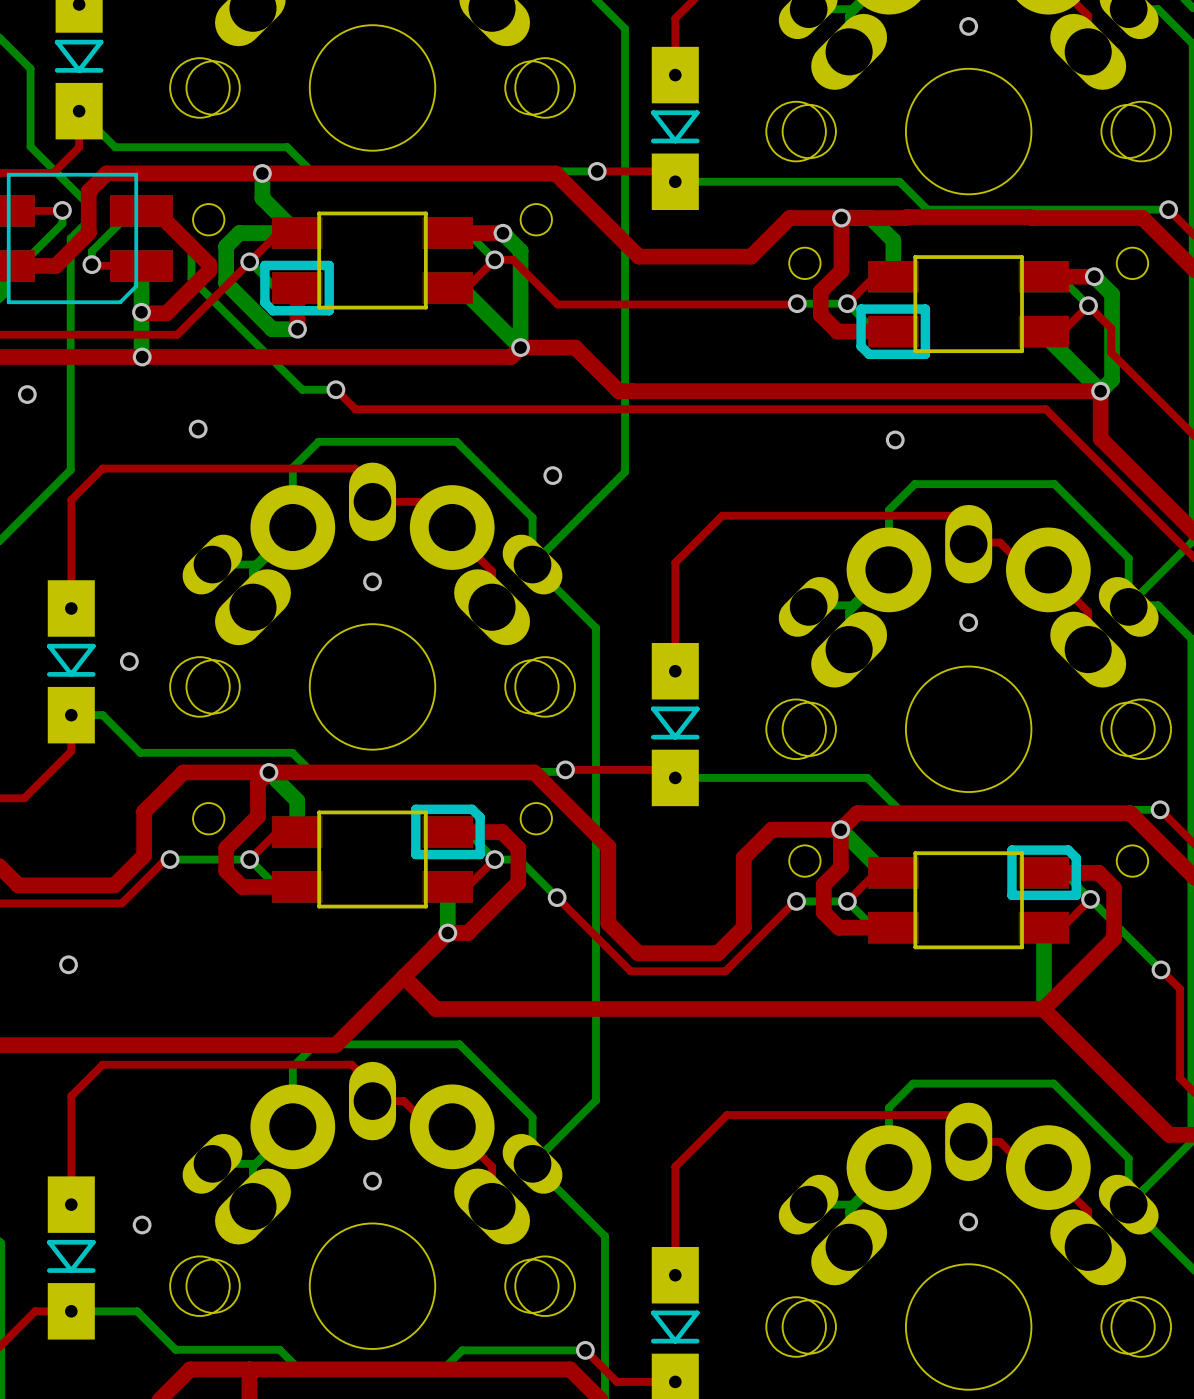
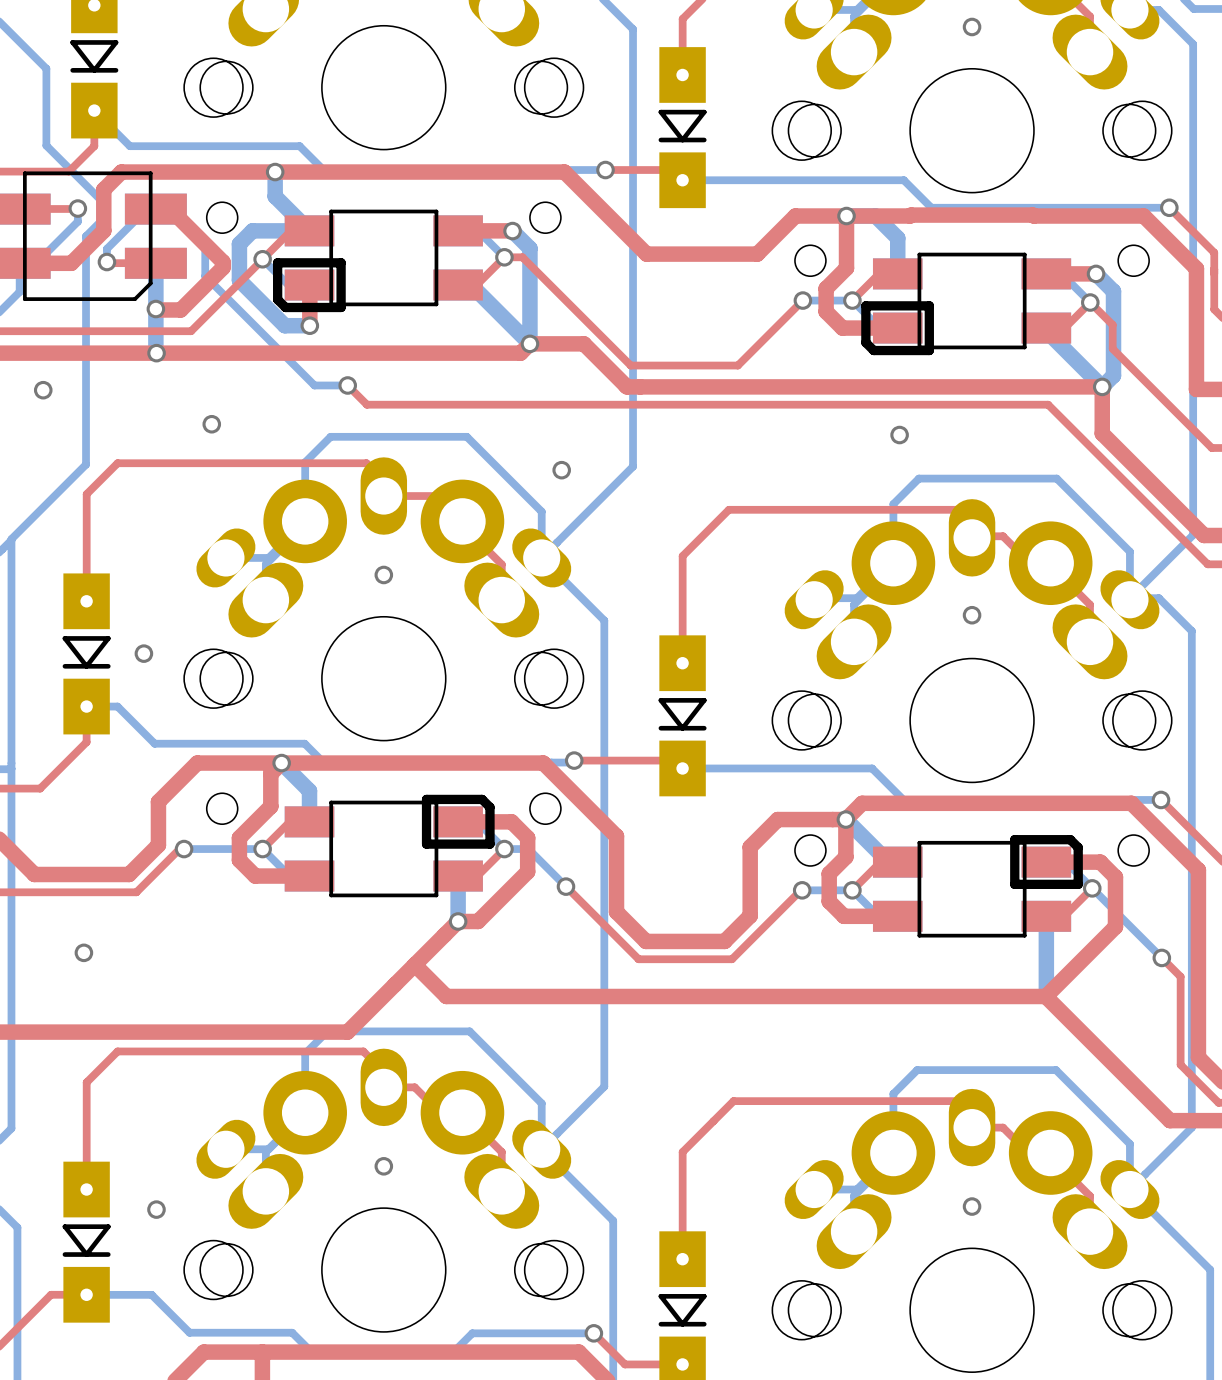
top track: (557, 304) (796, 304) -> (566, 301) (630, 365) (737, 365) (802, 301)

